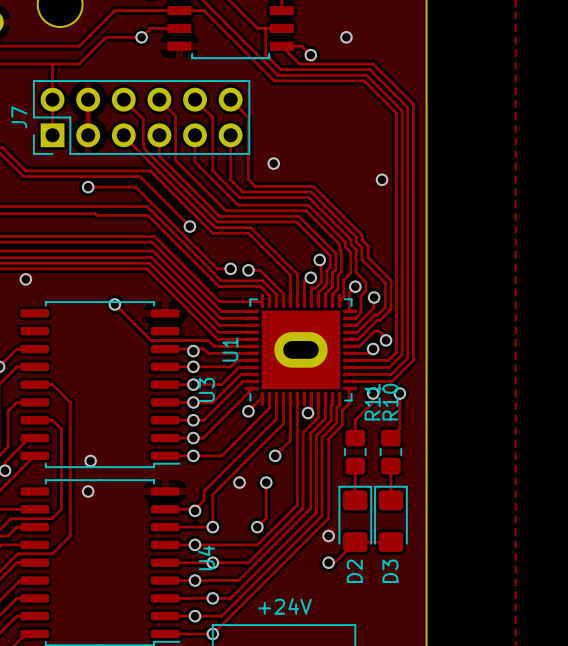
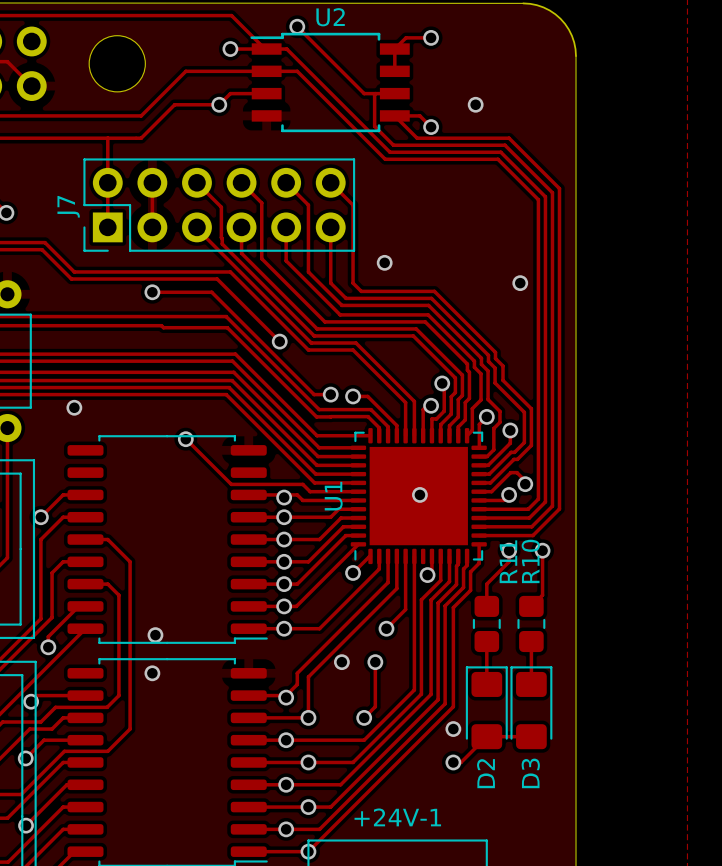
U1 footprint: [244, 293, 358, 407] -> [350, 428, 487, 565]
via: none -> (419, 494)
text: U3 (206, 389) -> none
text: U4 (206, 557) -> none
+24V name: +24V (285, 606) -> +24V-1 (397, 817)

